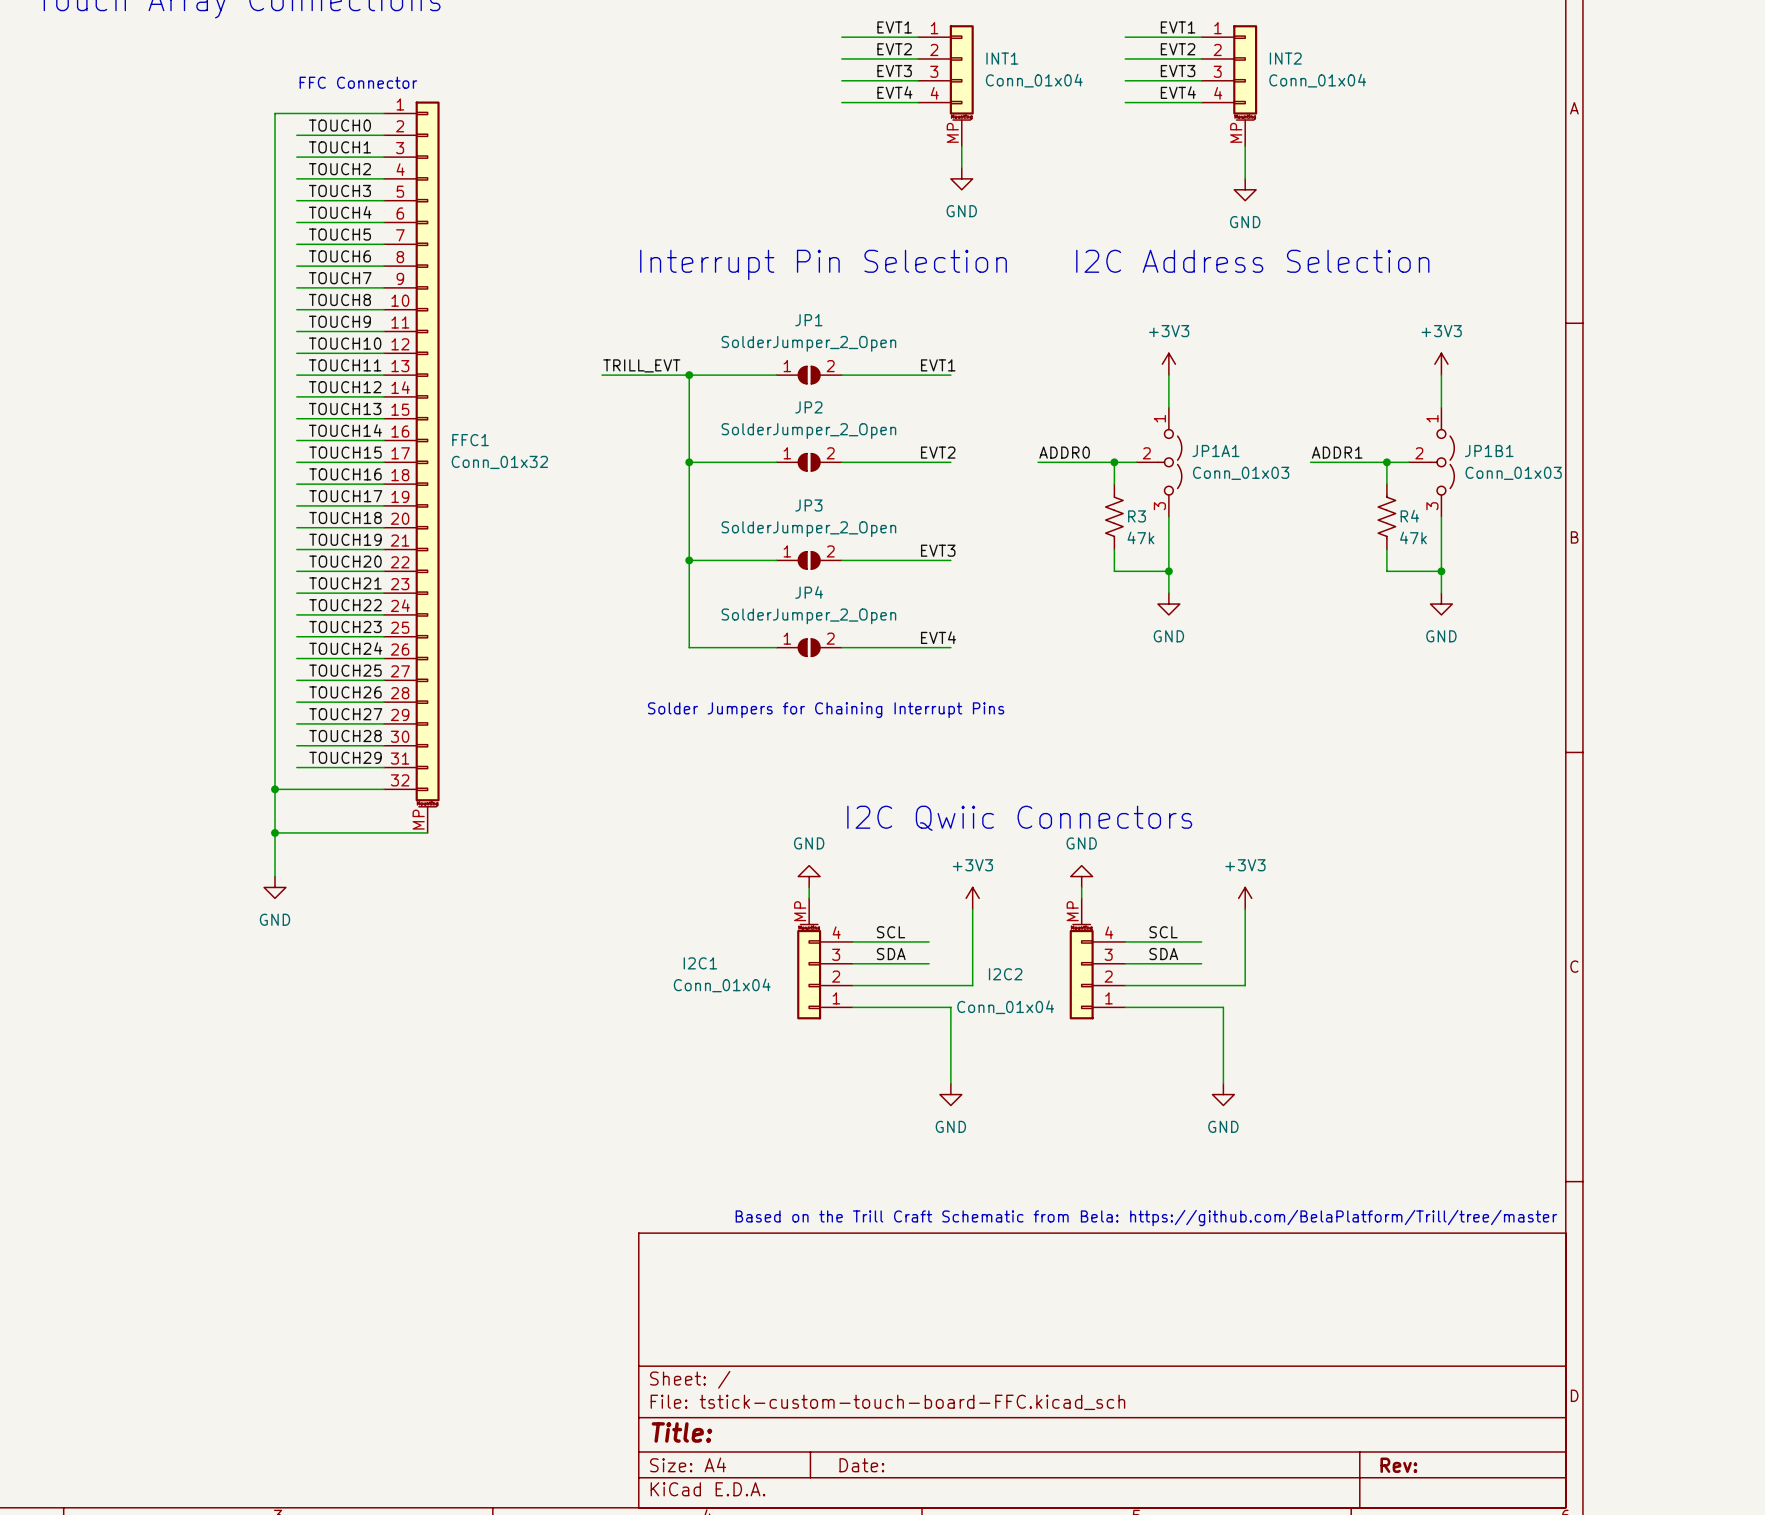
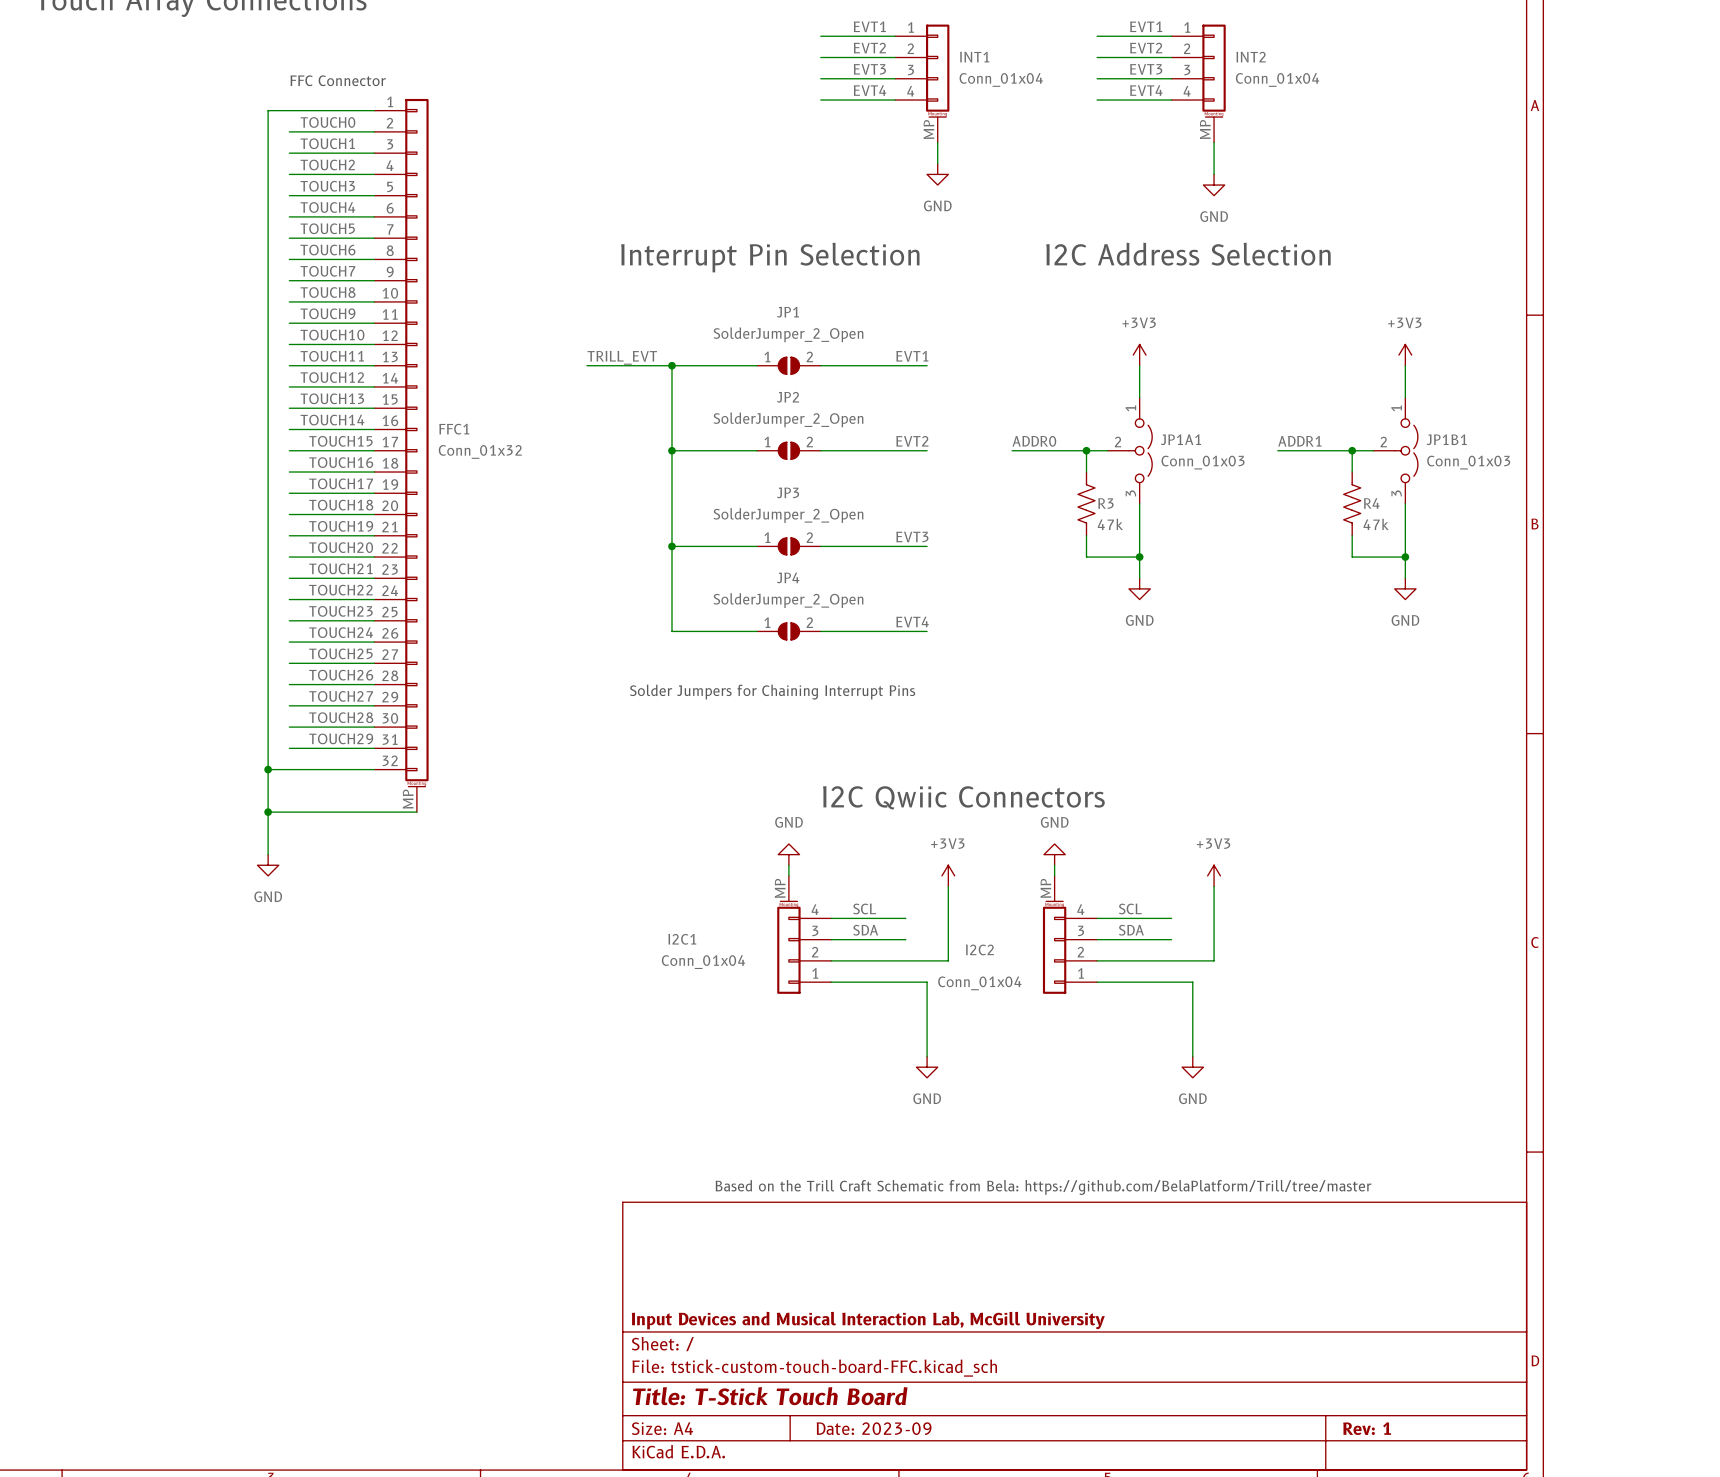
title block: none -> Input Devices and Musical Interaction Lab, McGill University (868, 1320)
title block: Title: (681, 1432) -> Title: T-Stick Touch Board (770, 1396)
title block: Date: (861, 1465) -> Date: 2023-09 (874, 1428)
title block: Rev: (1398, 1465) -> Rev: 1 (1367, 1428)

